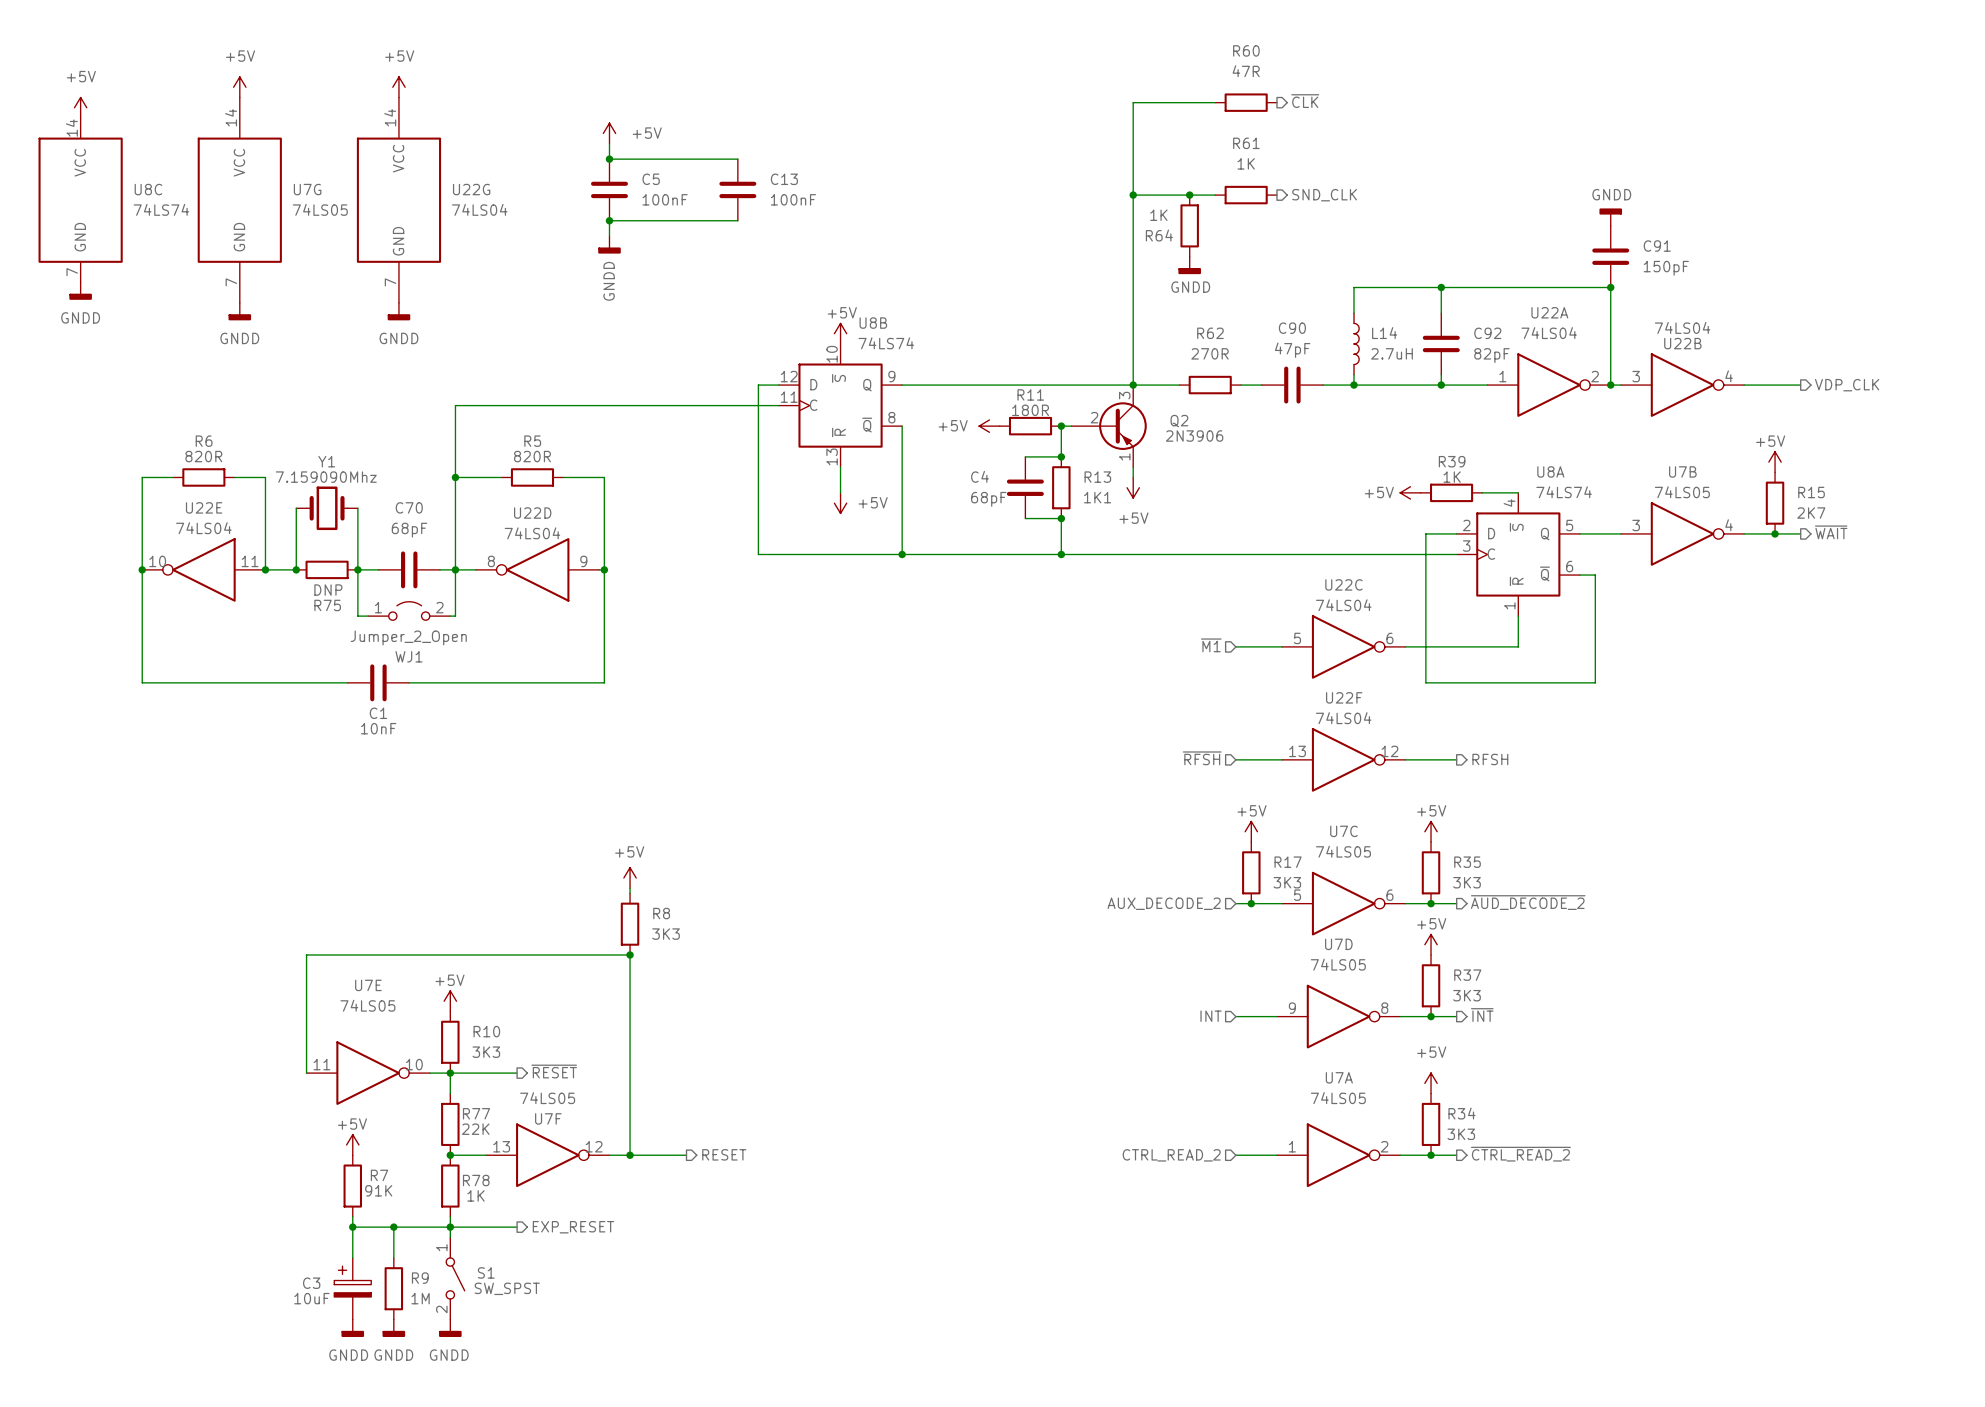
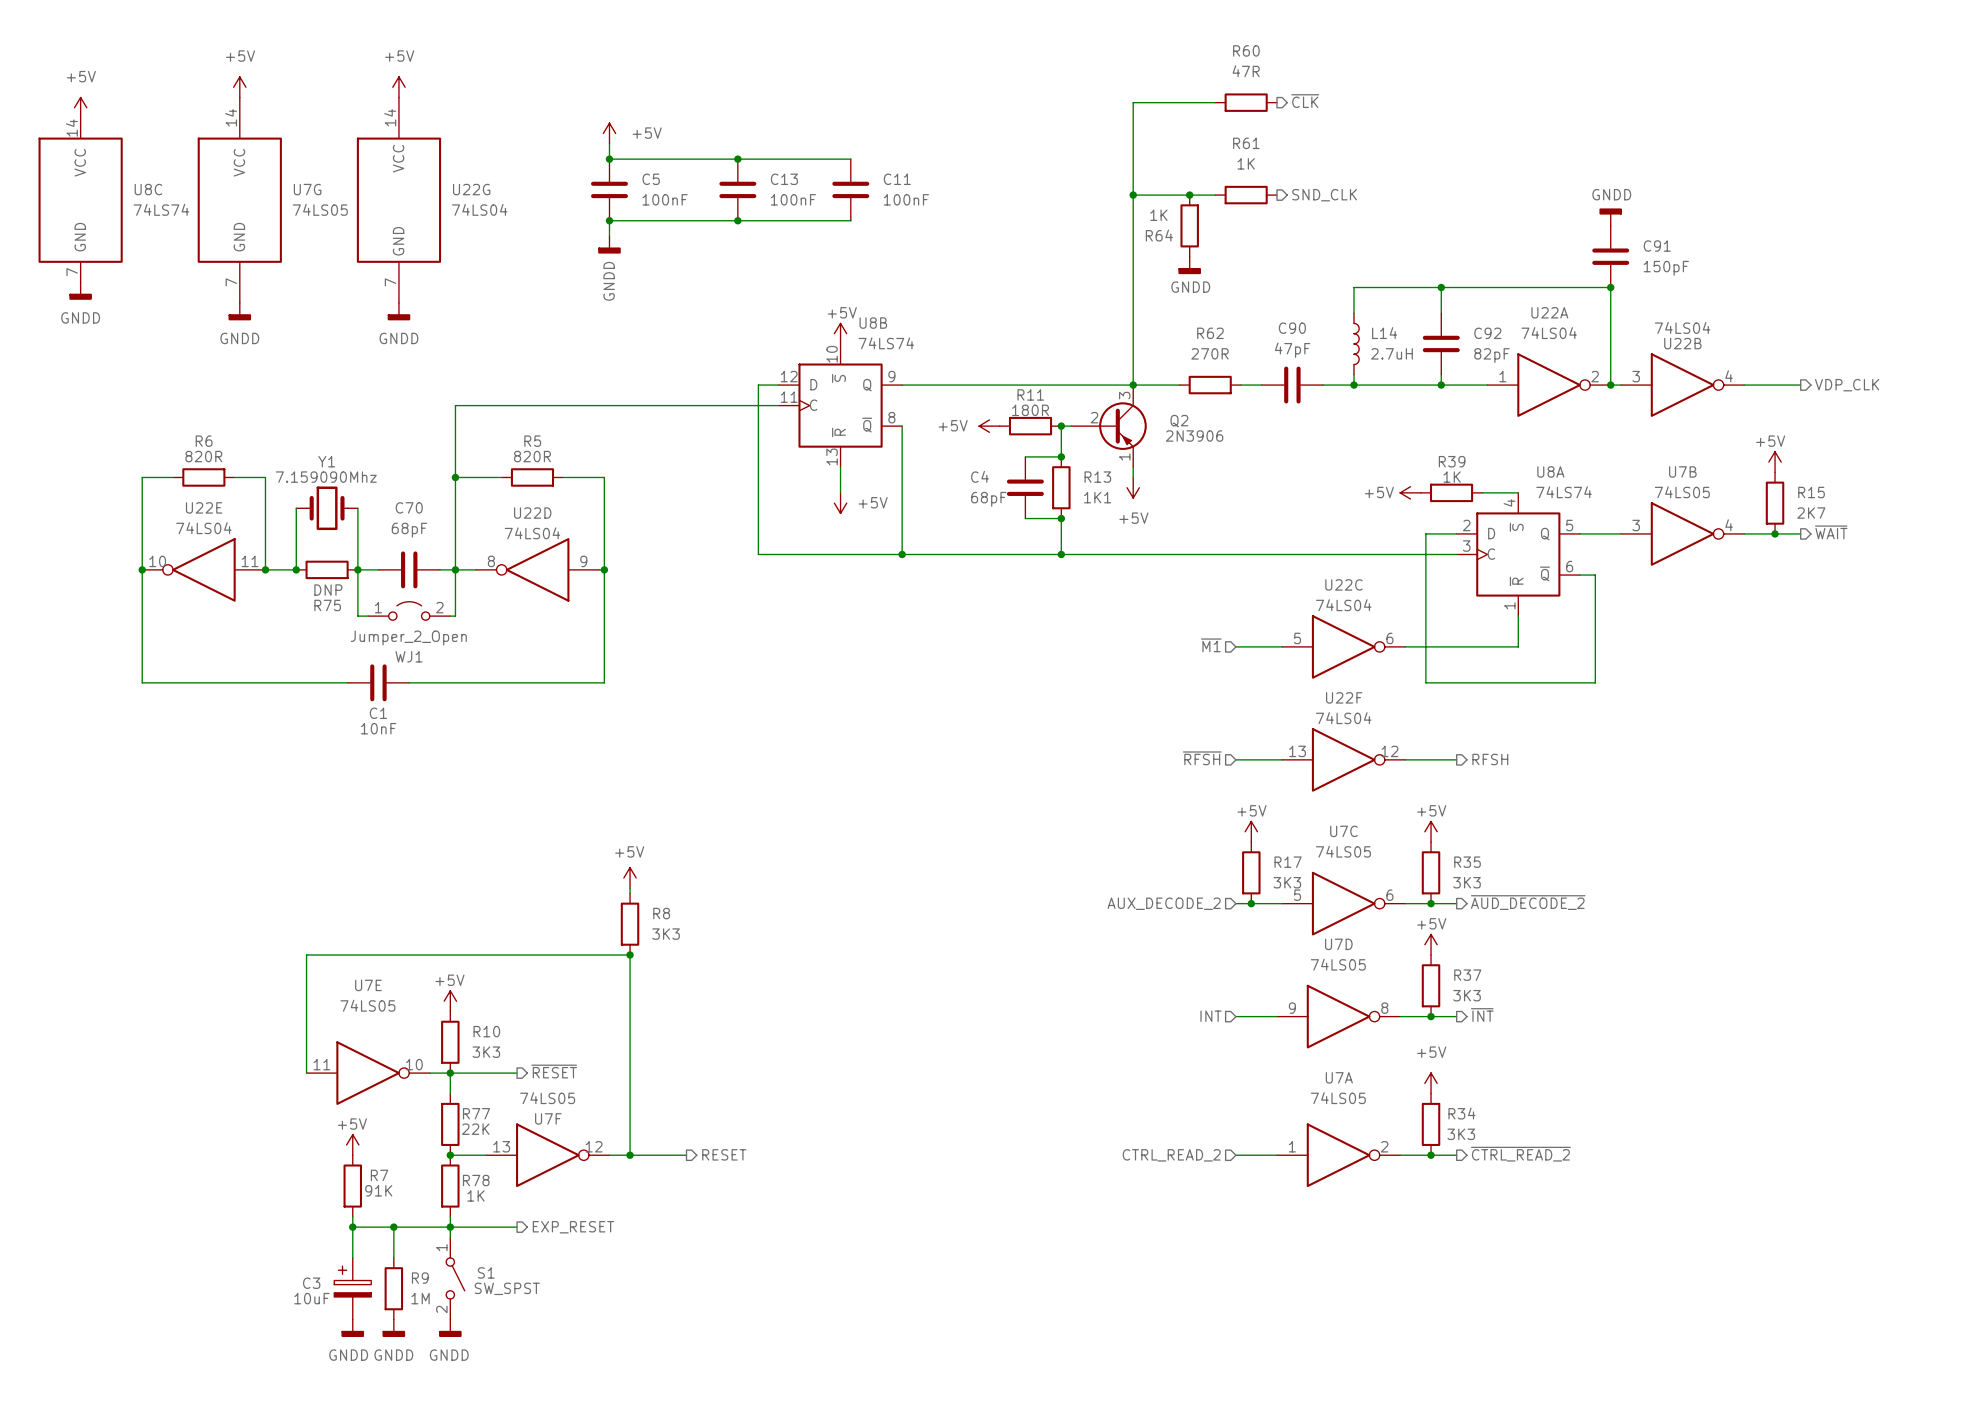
wire: none -> (737, 159) (850, 159)
junction: none -> (737, 159)
C11: none -> 100nF (850, 189)
wire: none -> (737, 220) (850, 220)
junction: none -> (737, 220)

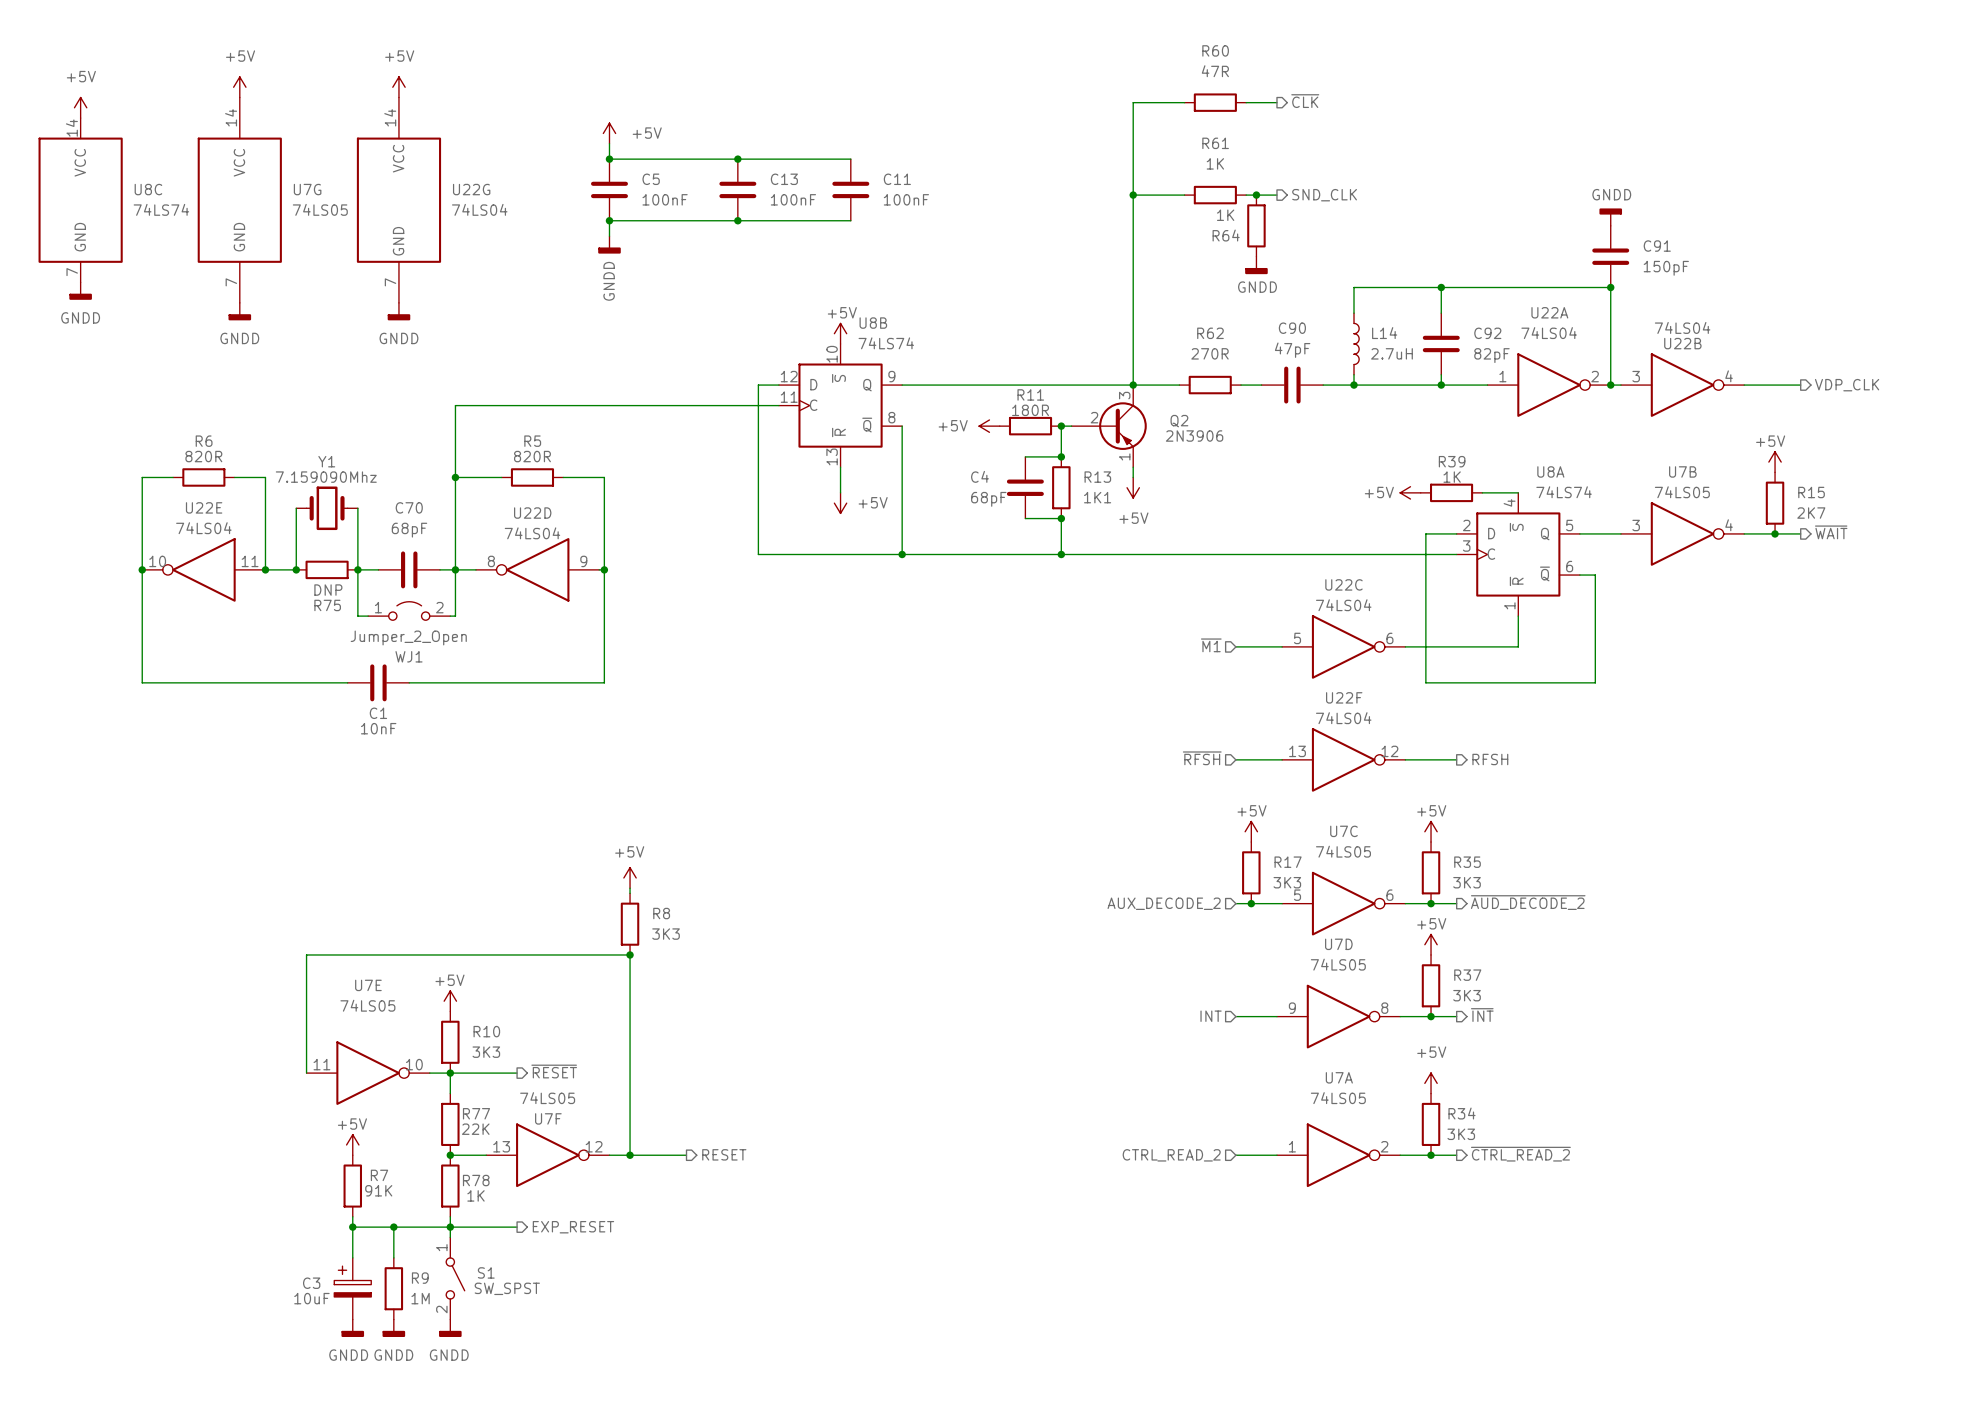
wire: (1184, 102) (1215, 102) -> (1246, 102) (1276, 102)
R60 position: (1246, 102) -> (1215, 102)
wire: (1184, 195) (1215, 195) -> (1246, 195) (1276, 195)
junction: (1189, 195) -> none
R61 position: (1246, 195) -> (1215, 195)
junction: none -> (1256, 195)
R64 position: (1189, 225) -> (1256, 225)
power symbol position: GNDD (1189, 265) -> GNDD (1256, 265)

